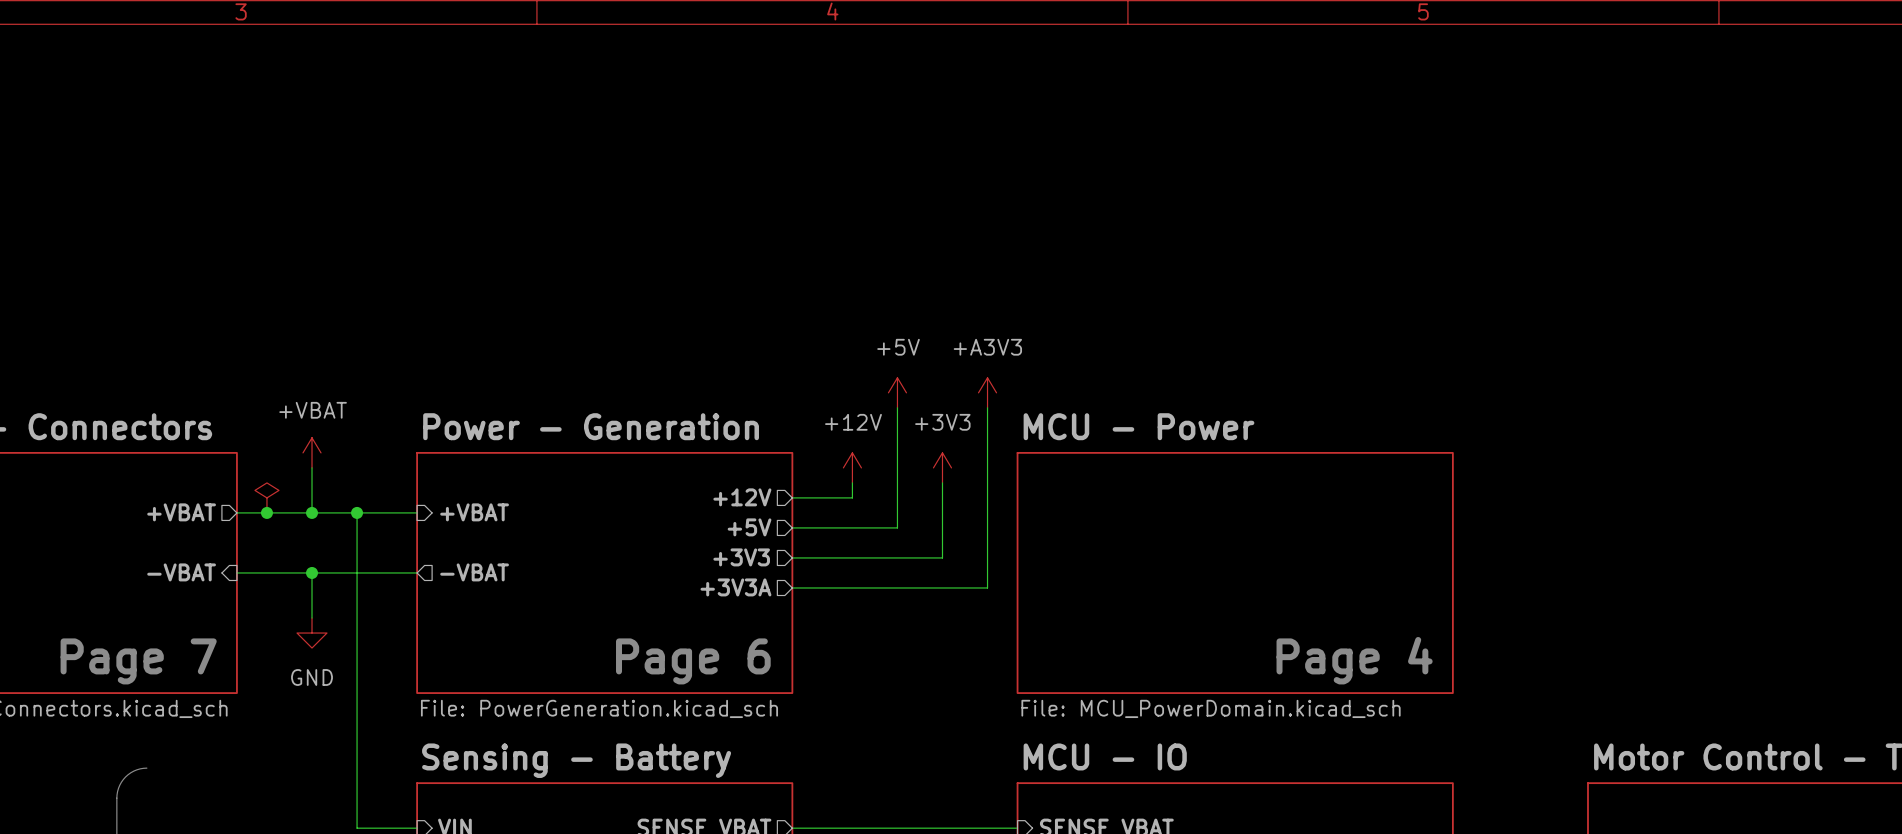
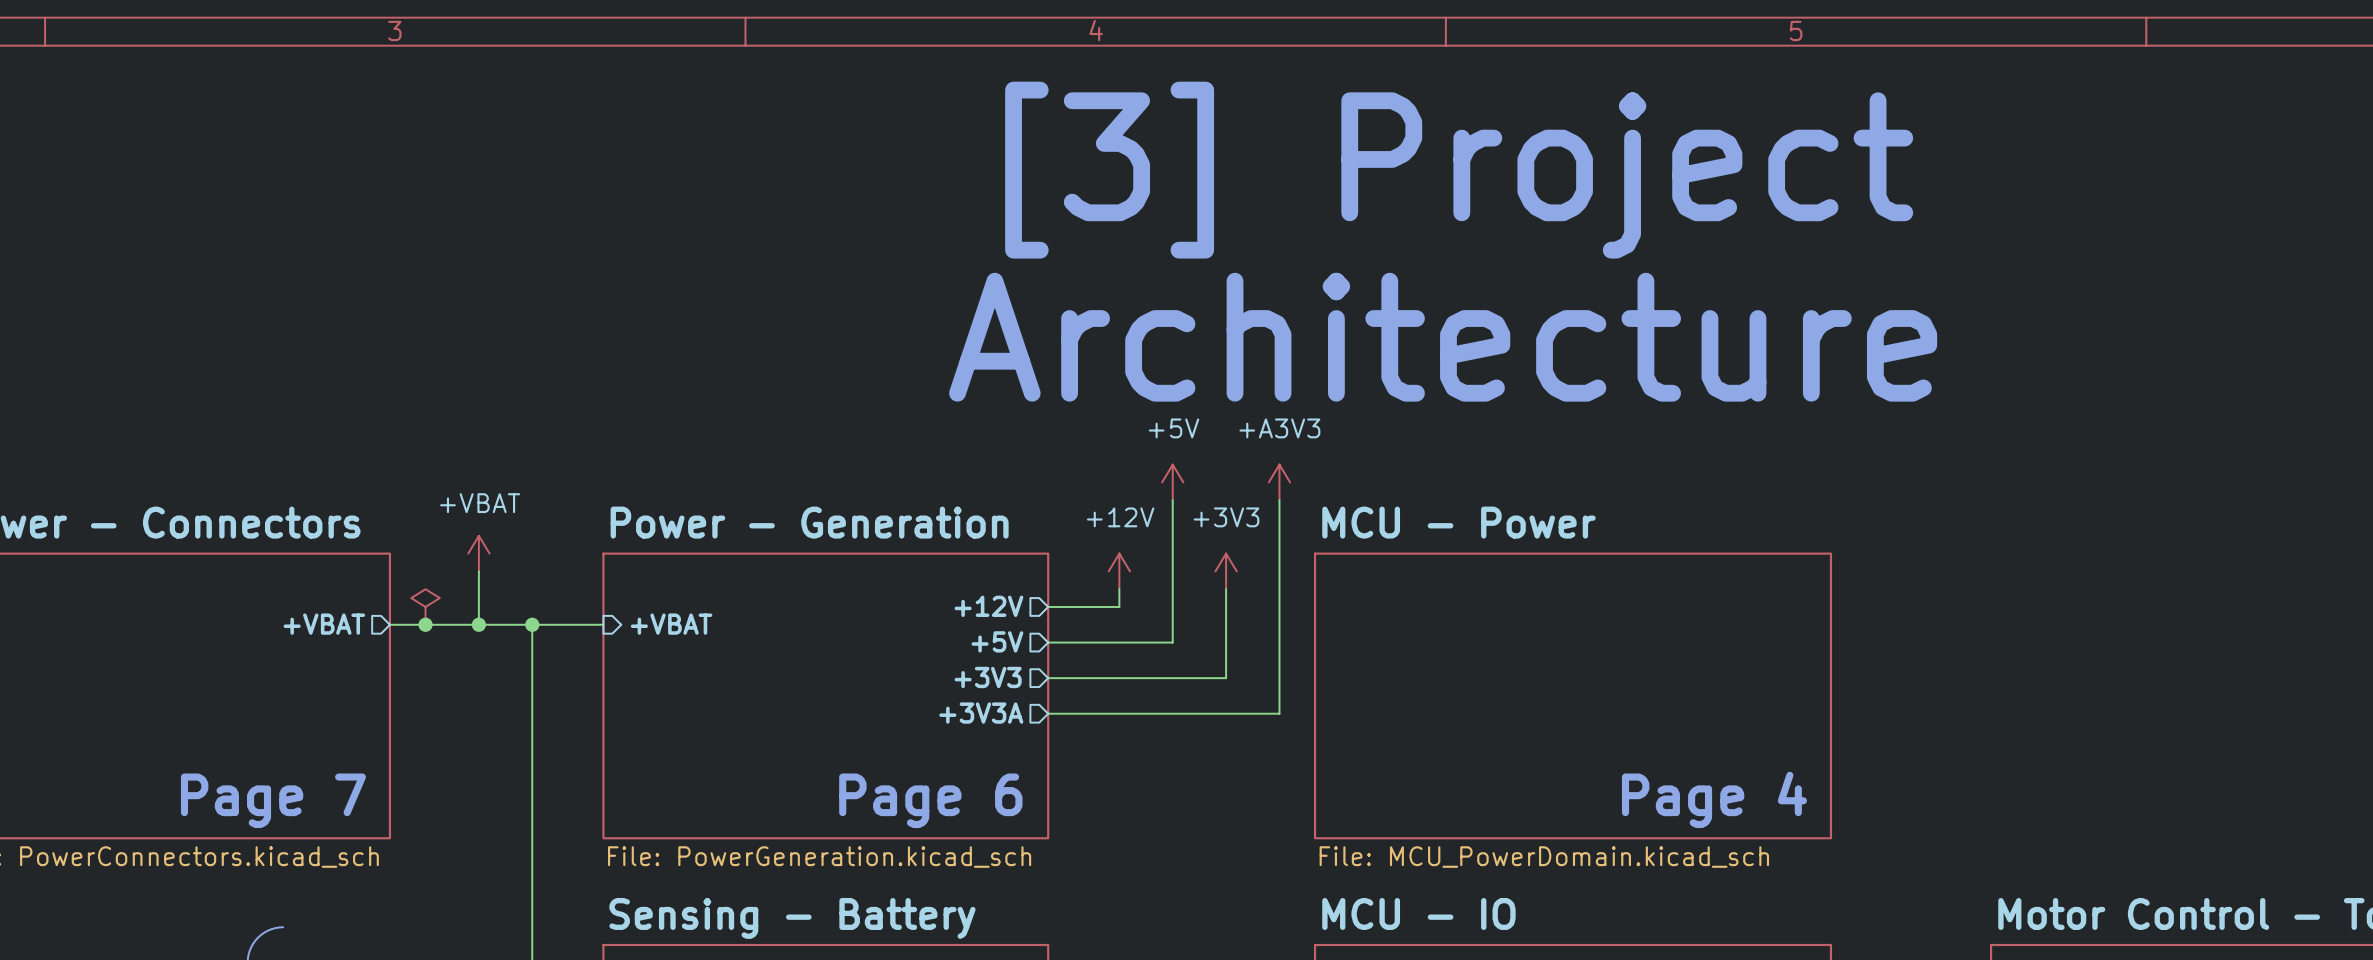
text: none -> [3] Project (1459, 170)
text: none -> Architecture (1443, 337)
sheet pin: -VBAT (181, 572) -> none
wire: (236, 572) (417, 572) -> none
wire: (312, 572) (312, 618) -> none
junction: (312, 572) -> none
sheet pin: -VBAT (474, 572) -> none
power symbol: GND (312, 633) -> none

